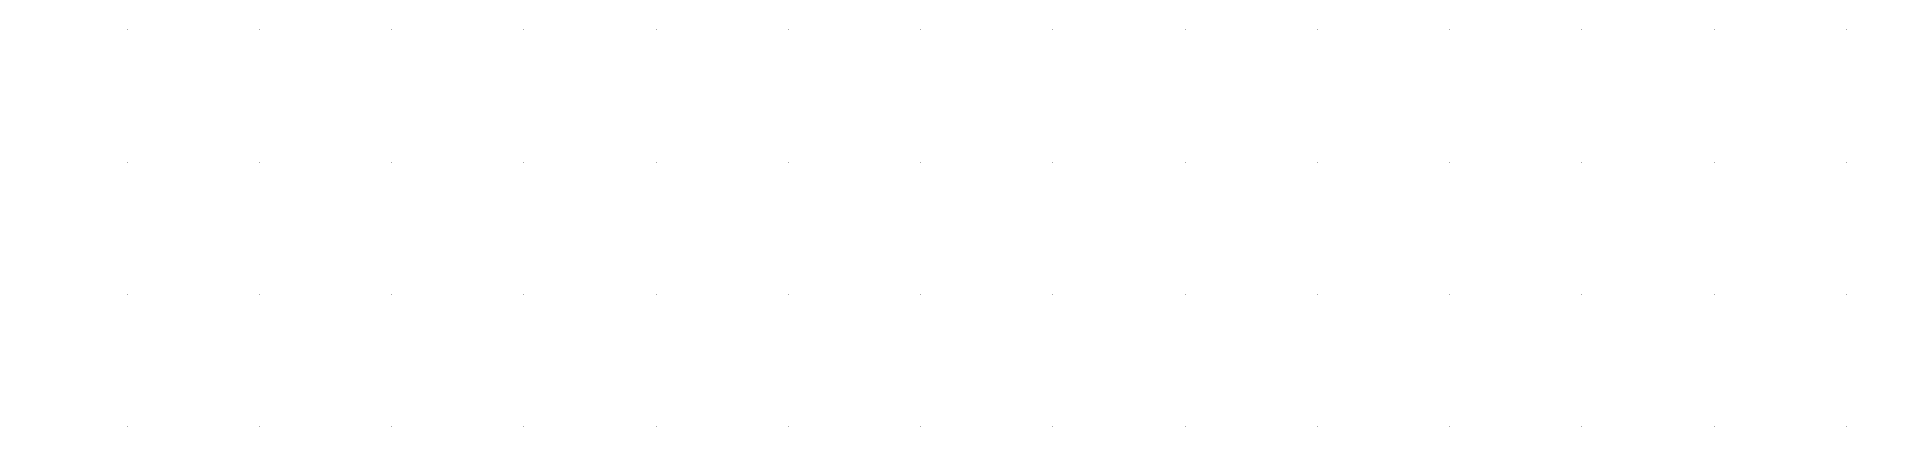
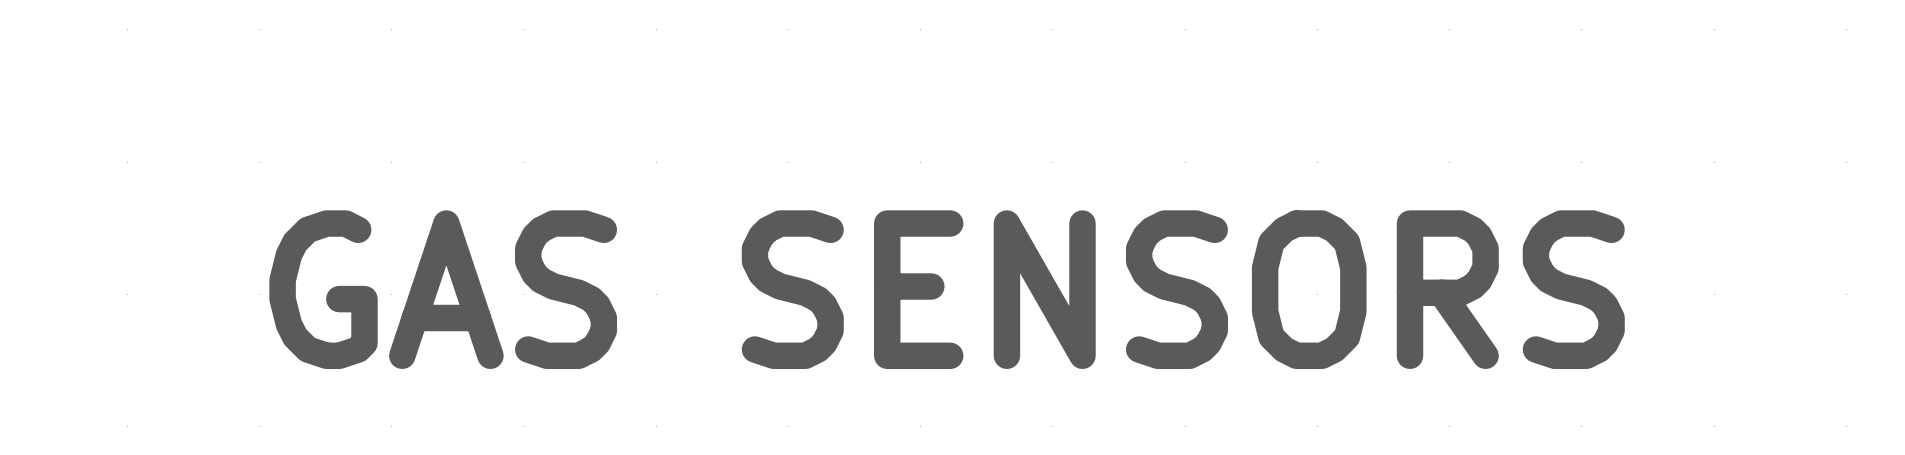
text: none -> GAS SENSORS (947, 289)

